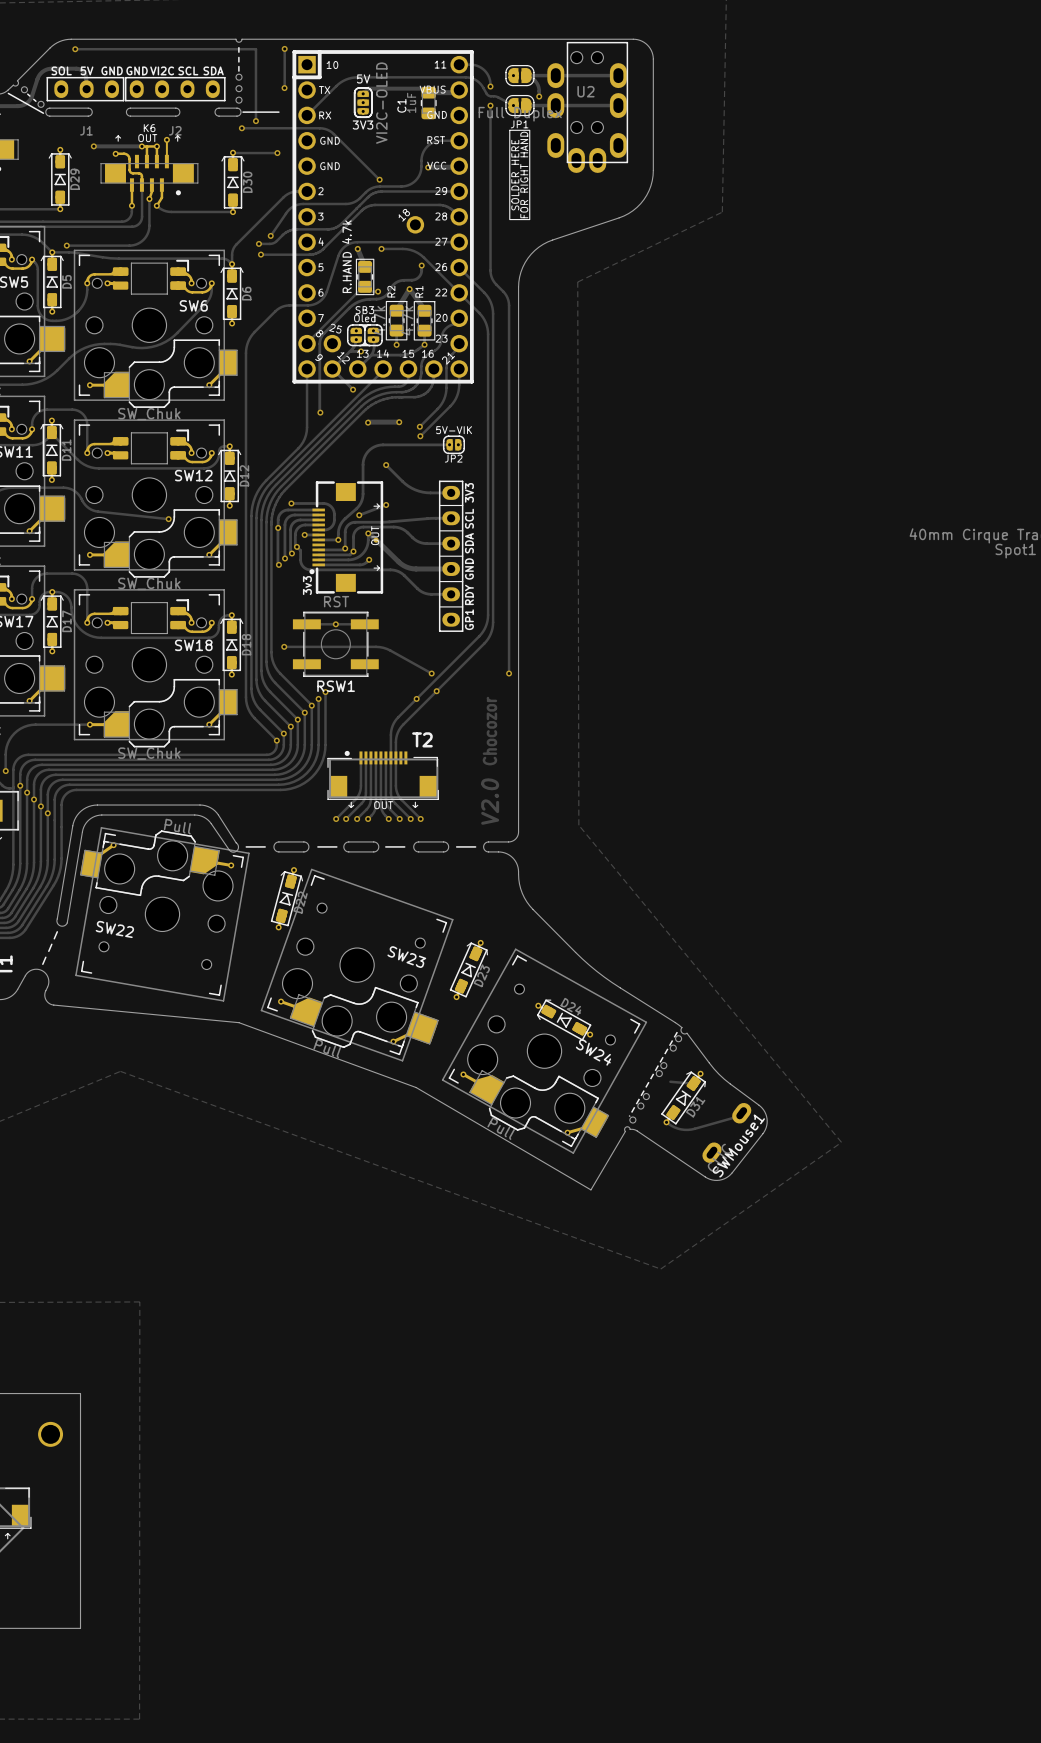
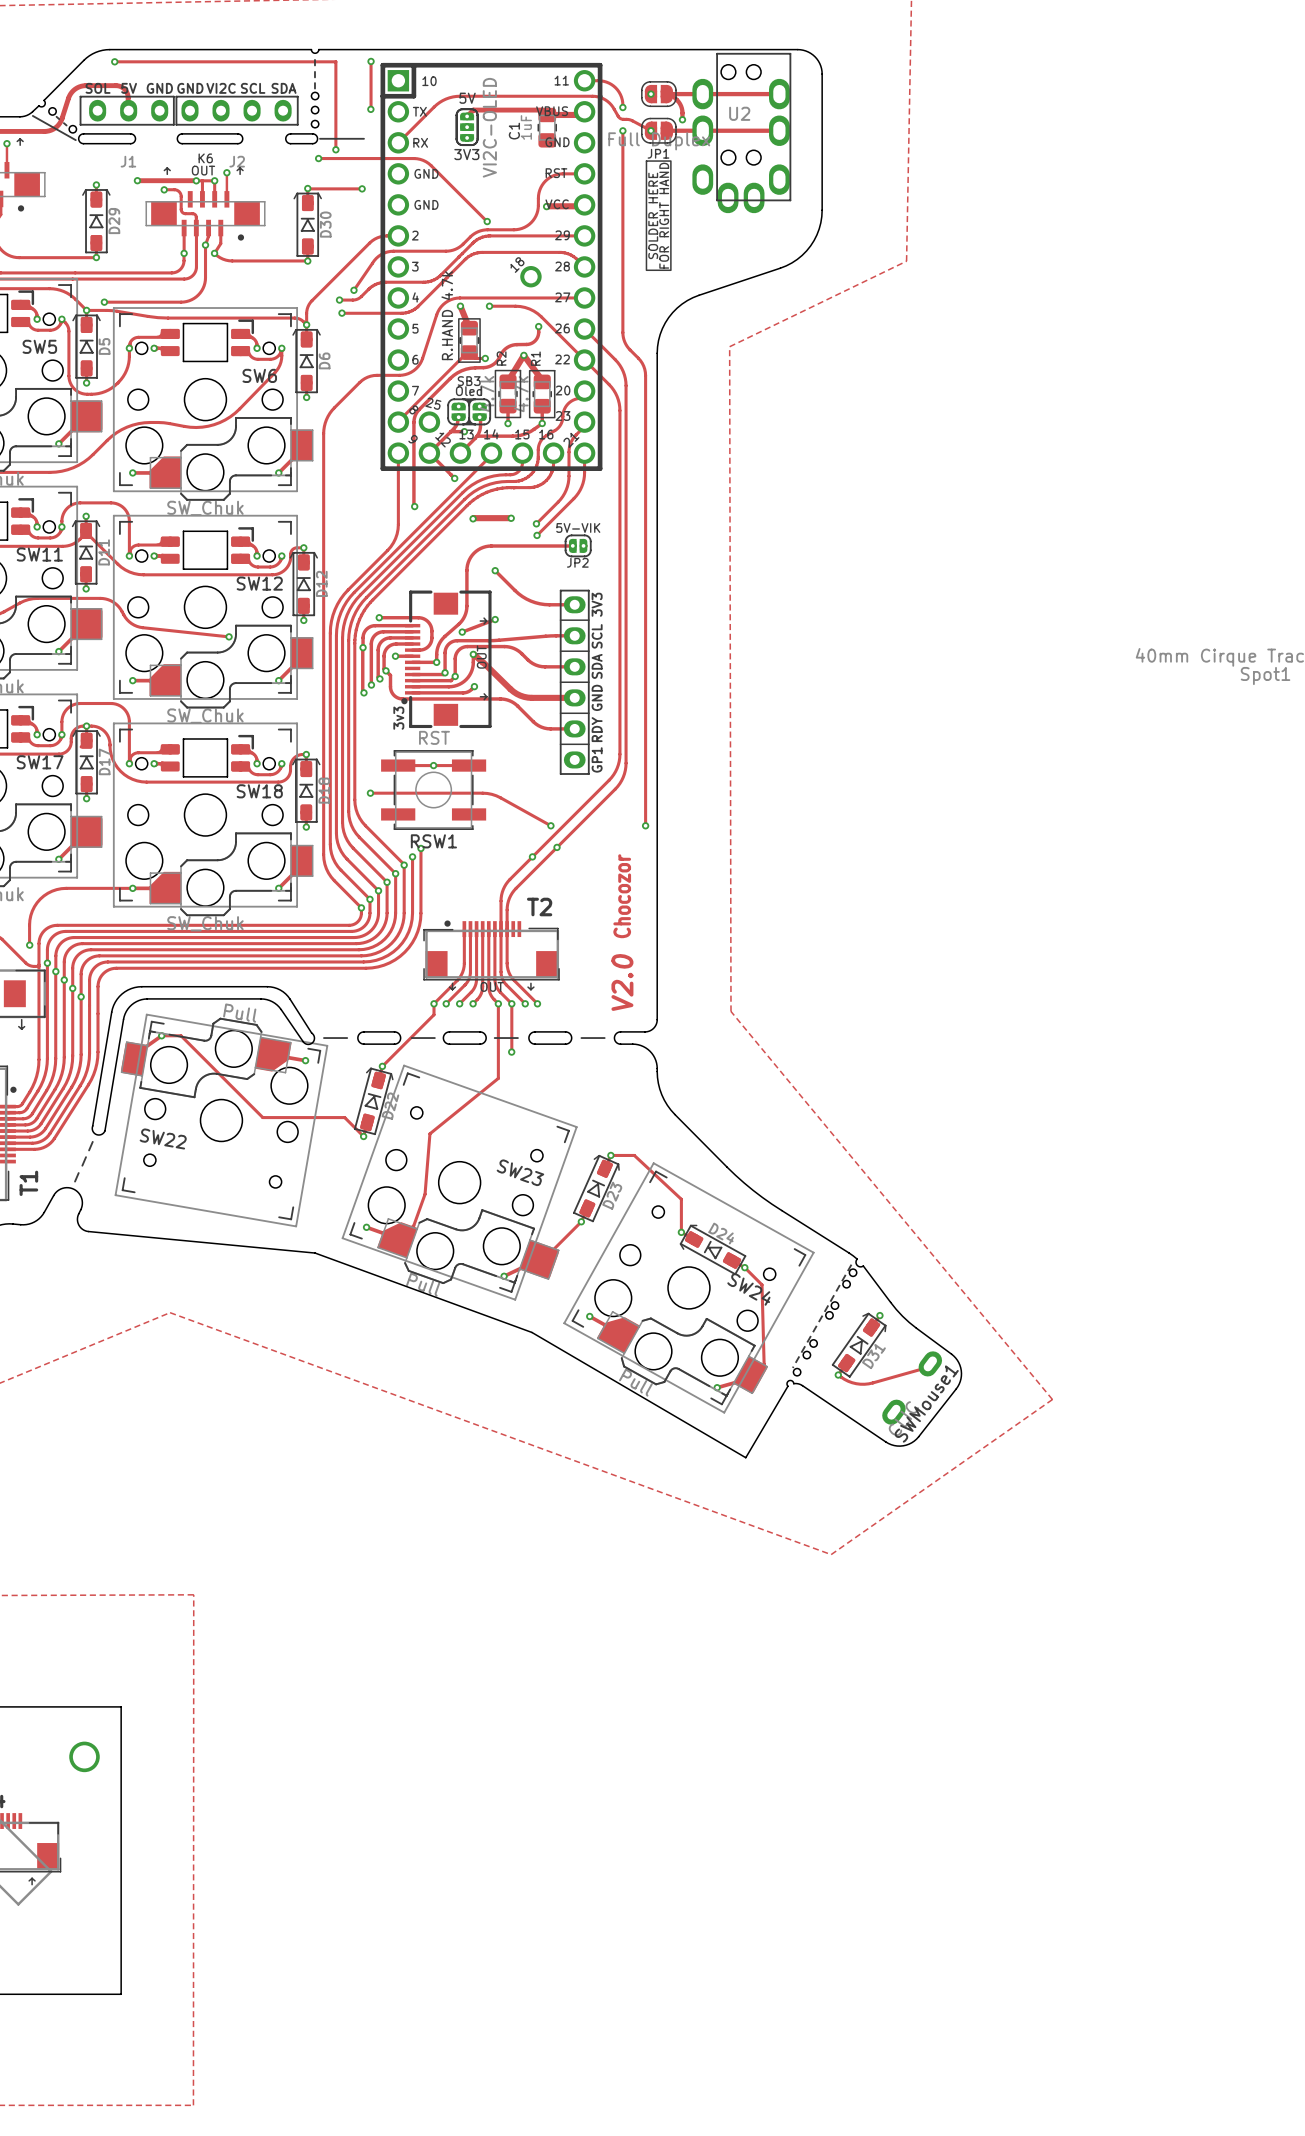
track: none -> (434, 1003) (434, 1014) (382, 1066)
track: none -> (498, 1003) (498, 1078) (429, 1133) (425, 1194) (413, 1225) (397, 1237)
track: none -> (511, 1003) (511, 1051)
track: none -> (161, 1035) (181, 1035) (262, 1117) (344, 1117) (363, 1136)
via: none -> (511, 1052)
track: none -> (610, 1155) (634, 1155) (681, 1199) (681, 1232)
track: none -> (581, 1221) (543, 1259) (539, 1259)
track: none -> (744, 1267) (762, 1284) (764, 1364) (750, 1374)
track: (670, 1081) (693, 1083) -> none

